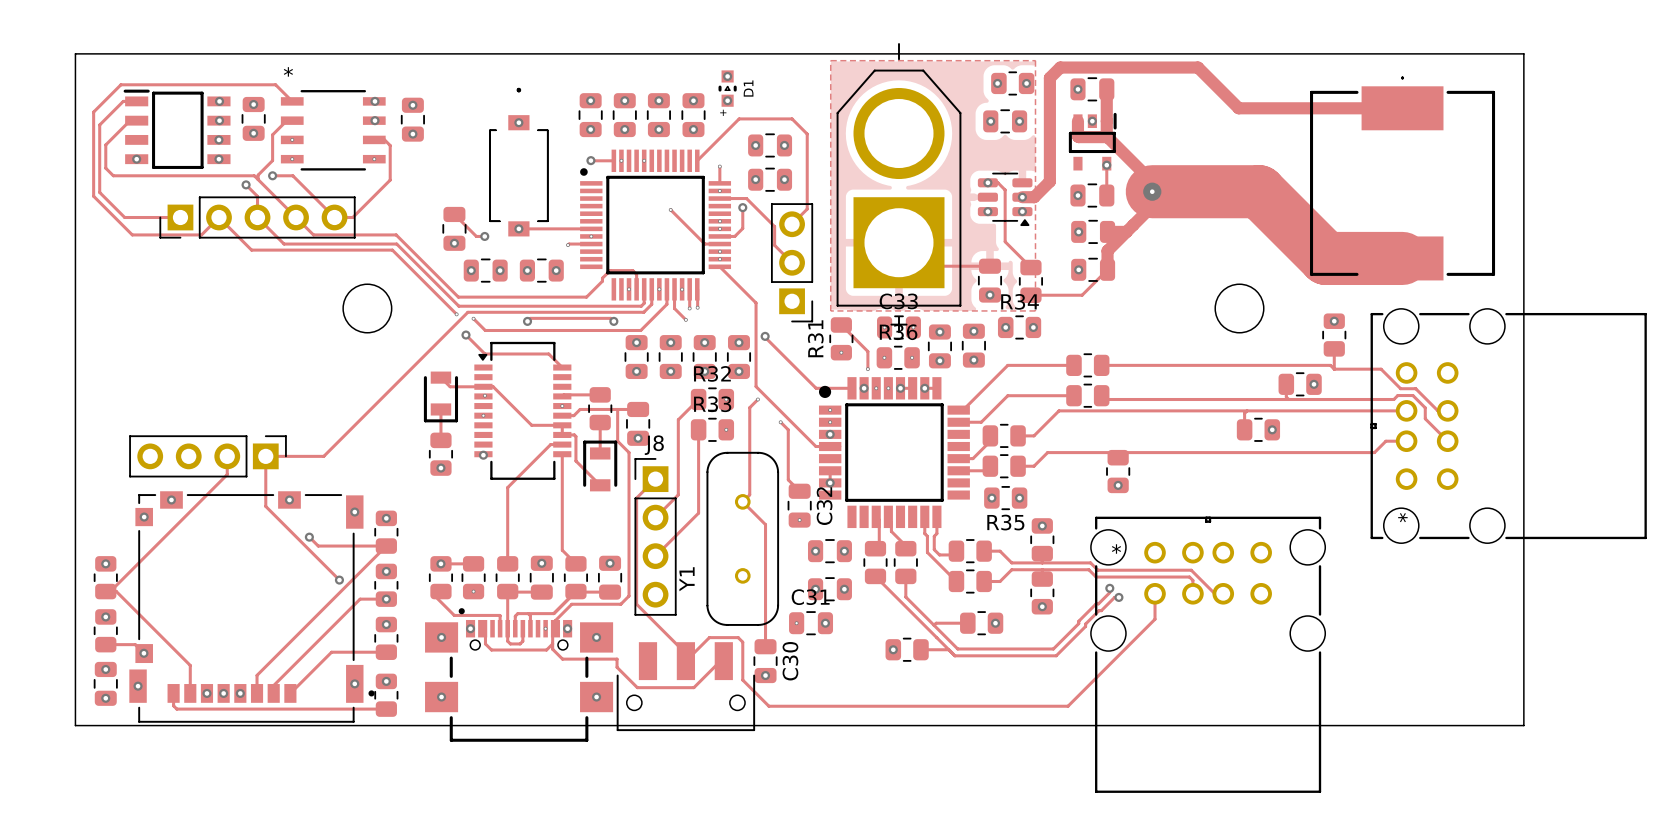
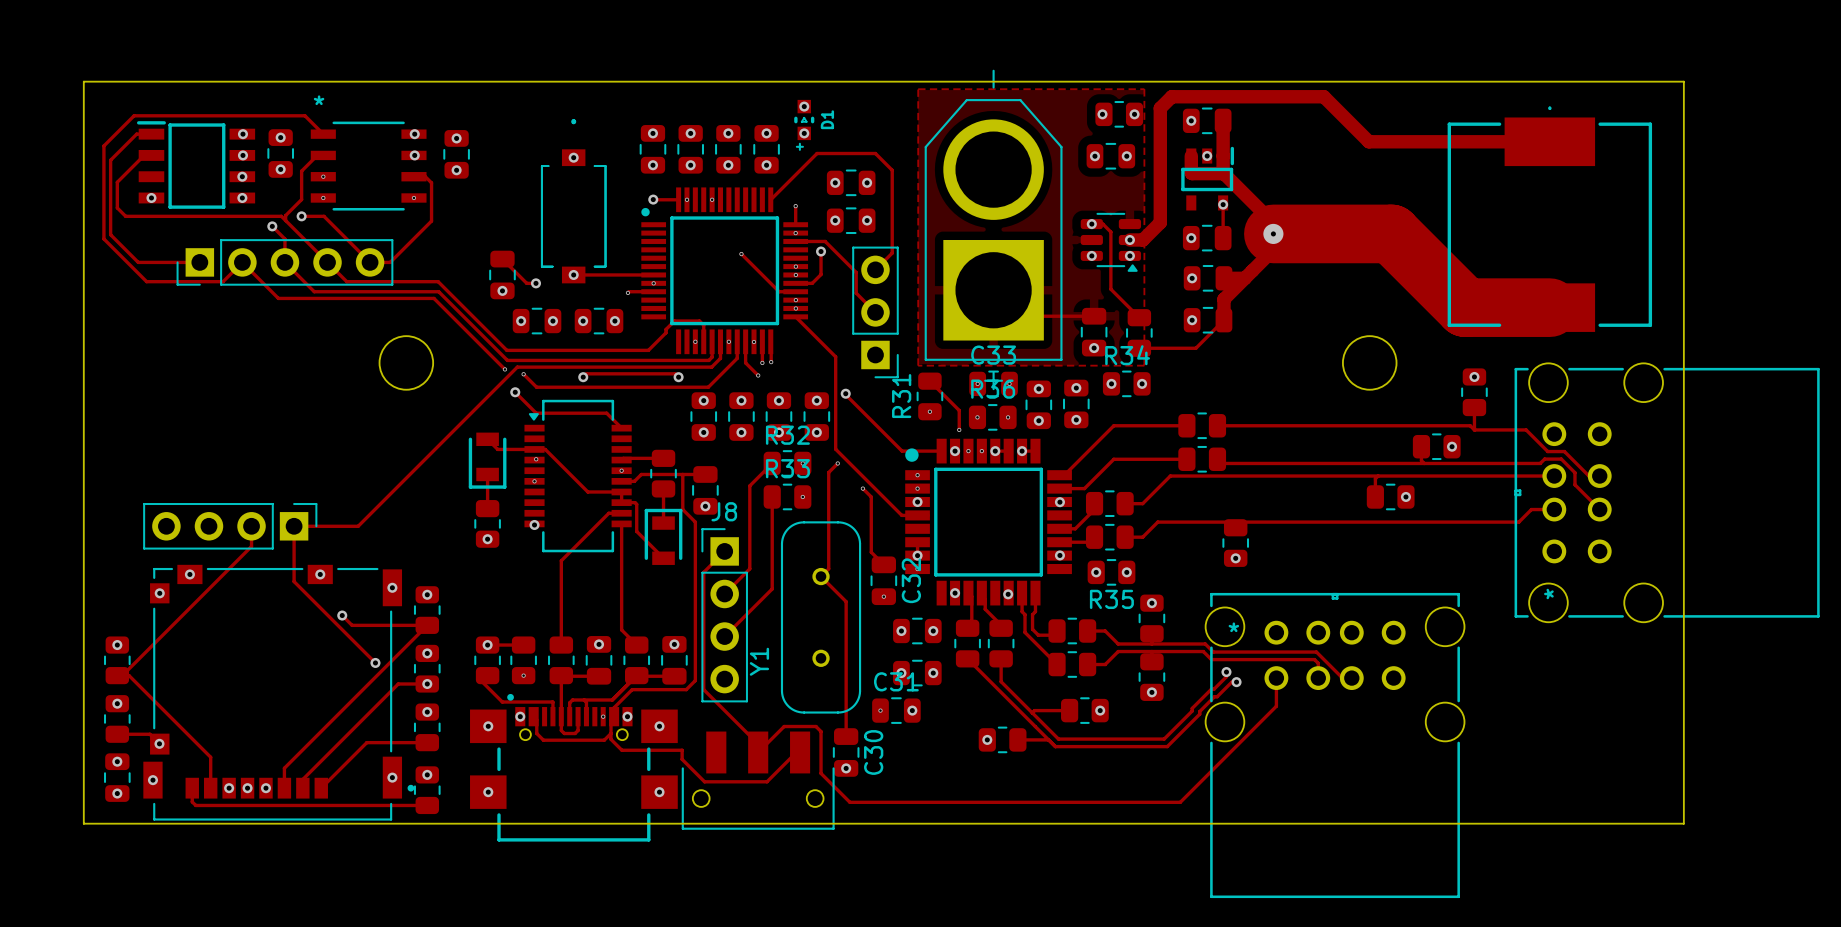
via: none -> (1059, 502)
via: none -> (1059, 555)
via: none -> (955, 593)
via: none -> (1008, 594)

